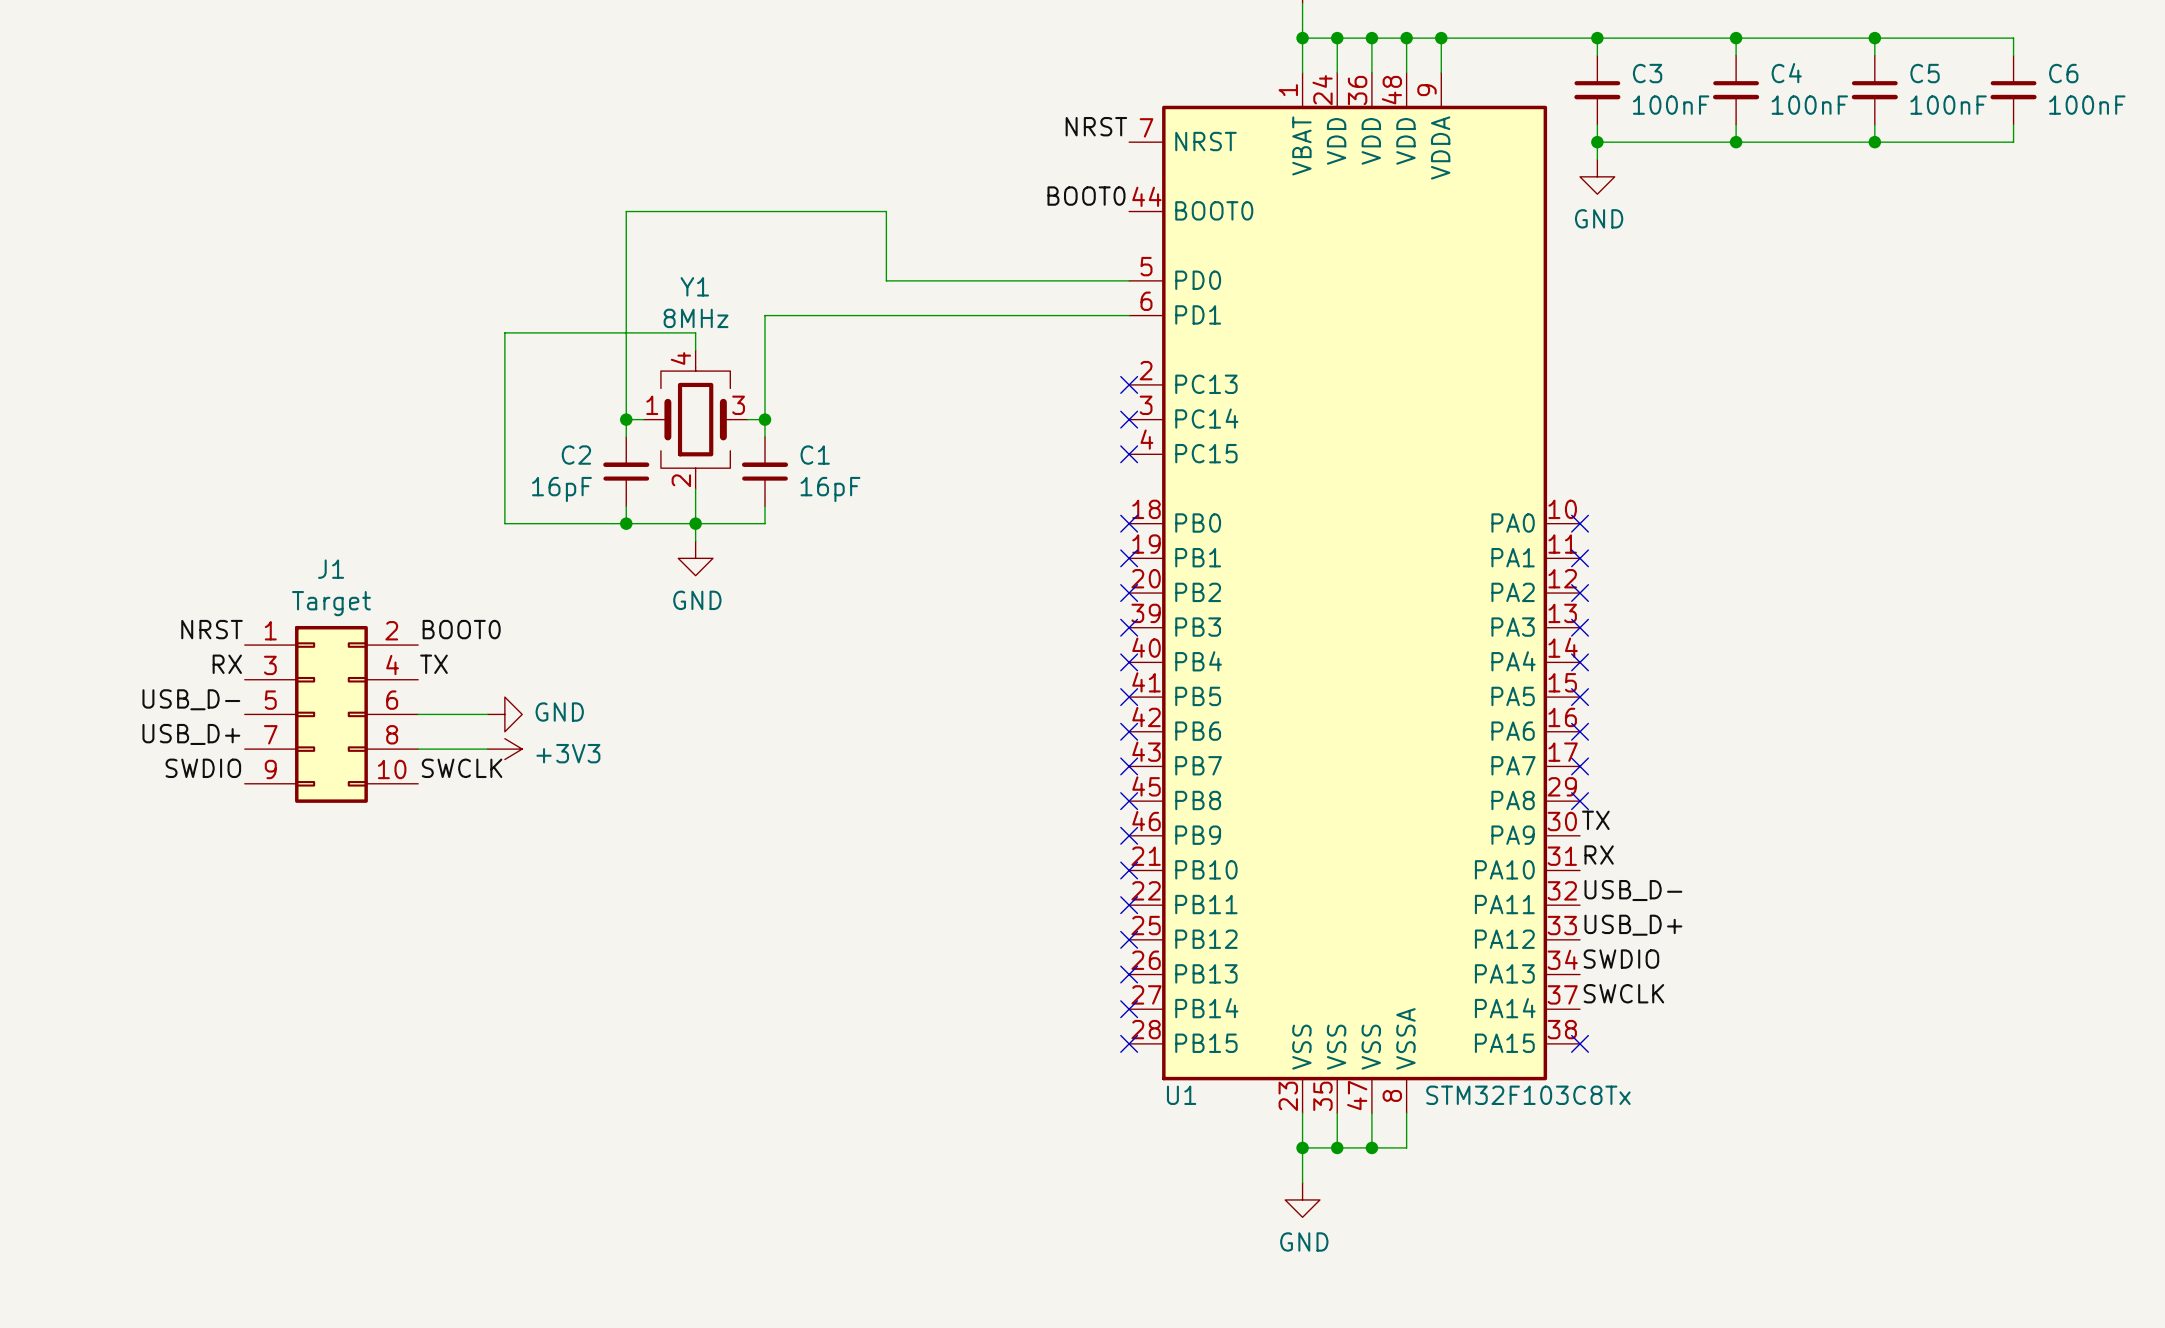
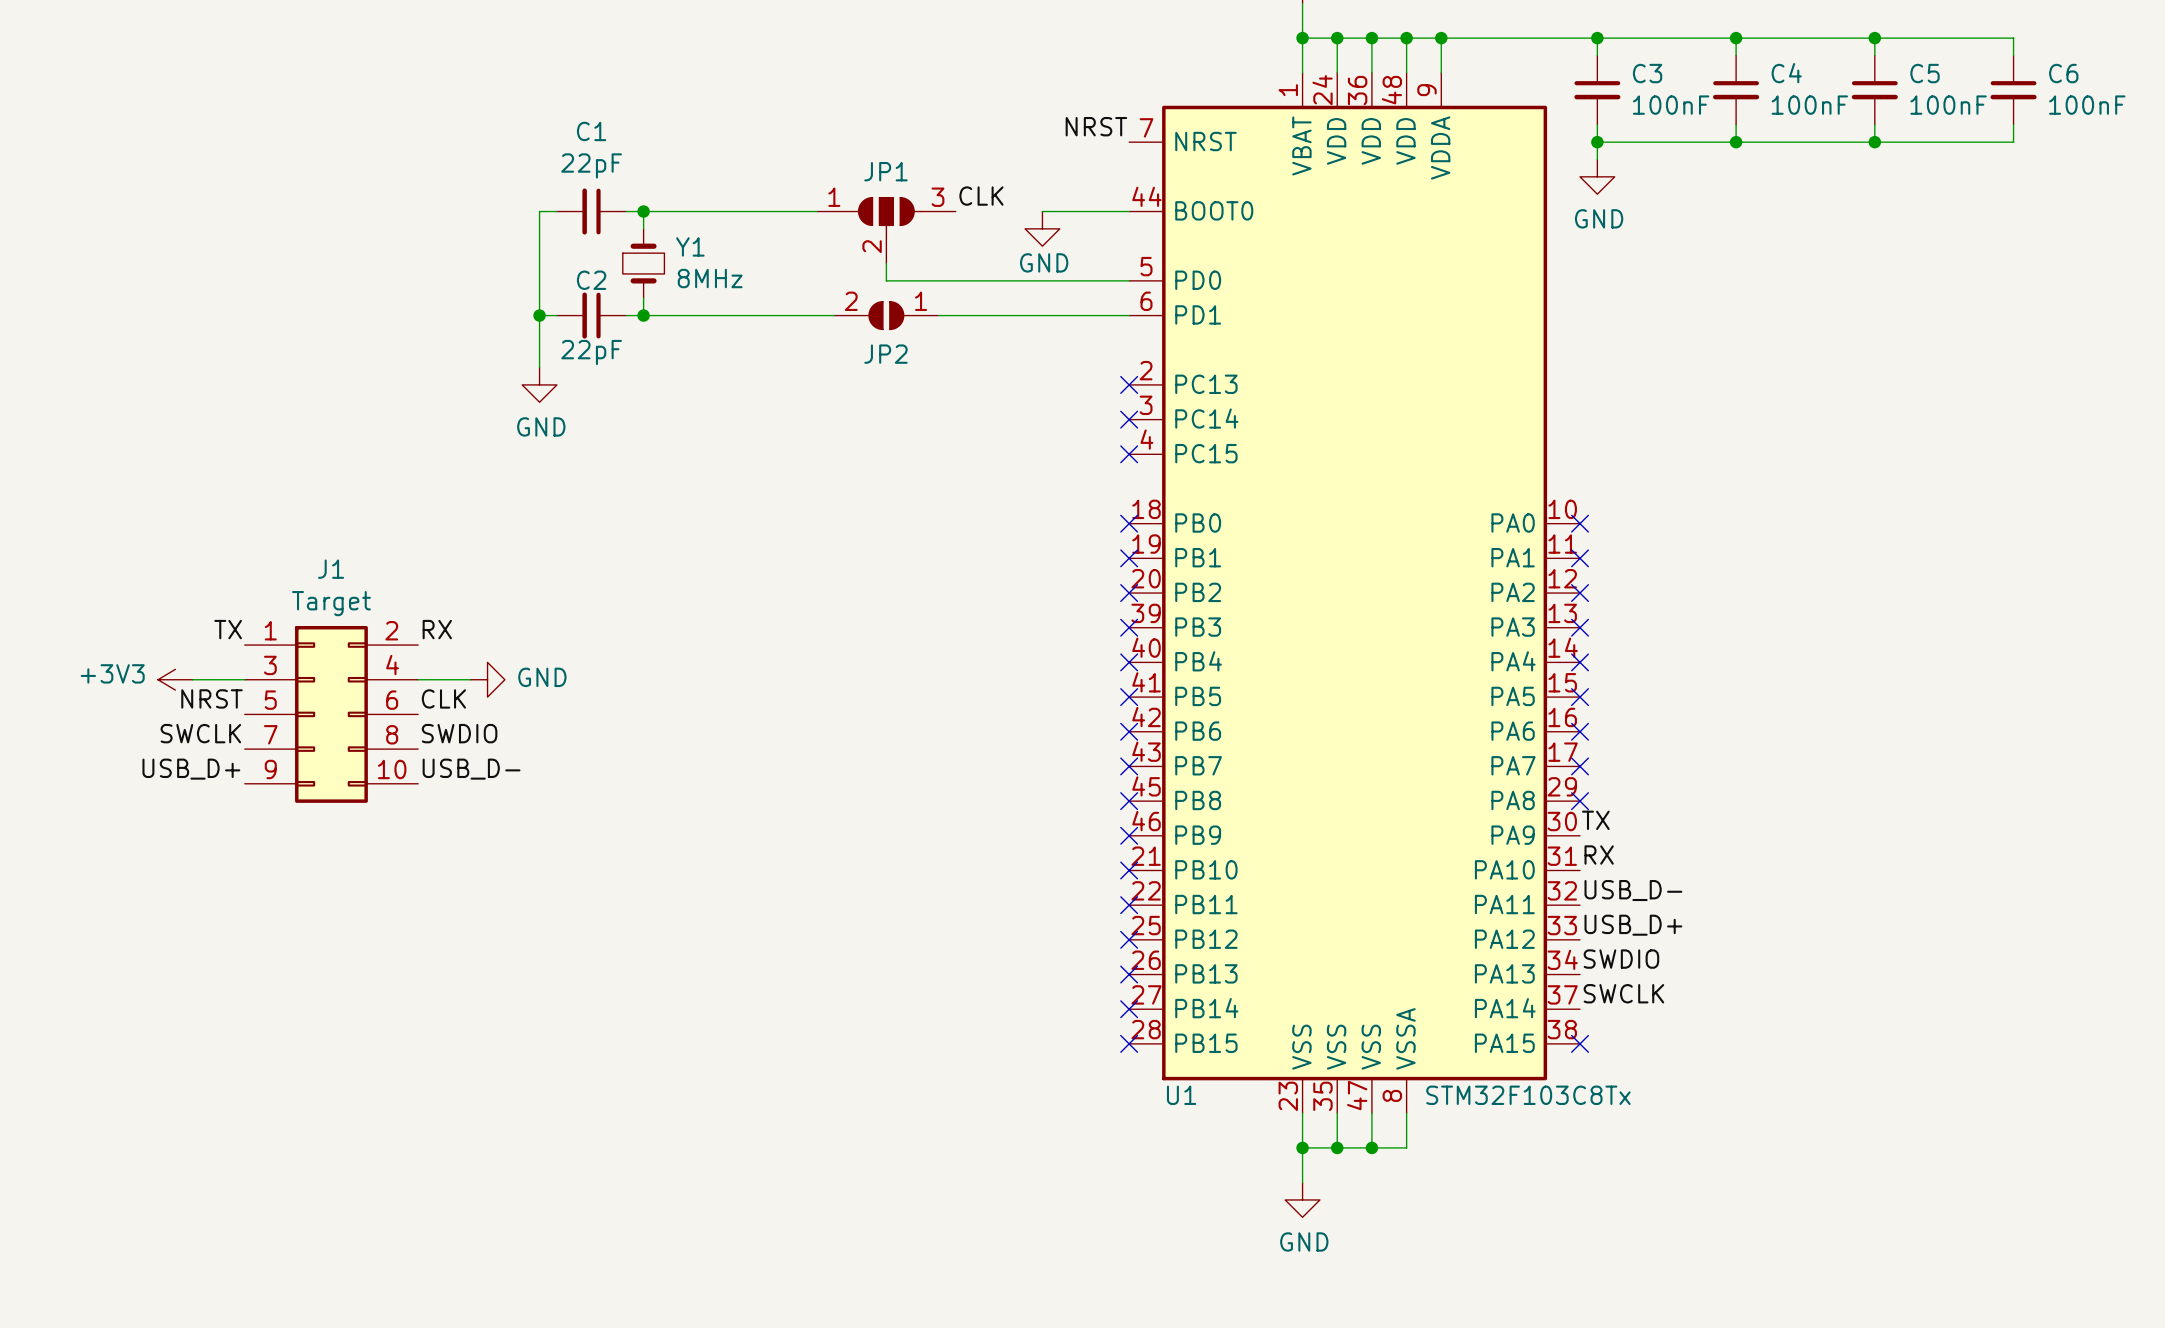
label: none -> CLK (981, 196)
label: BOOT0 (1086, 196) -> none
wire: none -> (556, 211) (539, 211) (539, 367)
wire: (626, 211) (626, 436) -> none
wire: none -> (643, 211) (643, 228)
junction: none -> (643, 211)
wire: none -> (1042, 211) (1129, 211)
power symbol: none -> GND (1042, 228)
JP1: none -> (886, 230)
Y1 name position: Y1 (694, 286) -> Y1 (690, 246)
junction: none -> (539, 315)
junction: none -> (643, 315)
wire: (764, 315) (764, 436) -> (764, 315) (626, 315)
JP2: none -> (886, 315)
Y1 value position: 8MHz (696, 318) -> 8MHz (710, 278)
Y1 symbol: [643, 350, 748, 489] -> [622, 228, 665, 299]
wire: (695, 350) (695, 332) (504, 332) (504, 523) (764, 523) (764, 506) -> none
power symbol: none -> GND (539, 384)
wire: (626, 419) (643, 419) -> (539, 315) (556, 315)
junction: (626, 419) -> none
wire: (747, 419) (764, 419) -> none
junction: (764, 419) -> none
C2 name position: C2 (576, 455) -> C2 (591, 280)
C1 name position: C1 (815, 455) -> C1 (591, 131)
C2 rotation: 0° (626, 471) -> 90° counterclockwise (591, 315)
C2 position: (626, 471) -> (591, 315)
C1 rotation: 0° (764, 471) -> 90° counterclockwise (591, 211)
C1 position: (764, 471) -> (591, 211)
wire: (695, 488) (695, 541) -> none
C2 value: 16pF (561, 489) -> 22pF (591, 352)
C1 value: 16pF (830, 489) -> 22pF (591, 165)
wire: (626, 506) (626, 523) -> (643, 298) (643, 315)
junction: (626, 523) -> none
junction: (695, 523) -> none
power symbol: GND (695, 558) -> none
label: NRST (212, 629) -> TX (228, 629)
label: BOOT0 (461, 629) -> RX (437, 629)
label: RX (227, 664) -> none
label: TX (433, 664) -> none
wire: none -> (192, 679) (244, 679)
wire: none -> (418, 679) (470, 679)
label: none -> CLK (443, 698)
label: USB_D- (191, 699) -> NRST (212, 698)
wire: (418, 714) (487, 714) -> none
power symbol position: GND (504, 714) -> GND (487, 679)
label: none -> SWDIO (459, 733)
label: USB_D+ (191, 734) -> SWCLK (200, 733)
wire: (418, 749) (487, 749) -> none
power symbol rotation: 0° (504, 749) -> 180° (175, 679)
power symbol position: +3V3 (504, 749) -> +3V3 (175, 679)
label: SWDIO (203, 768) -> USB_D+ (191, 769)
label: SWCLK (462, 768) -> USB_D- (471, 769)

